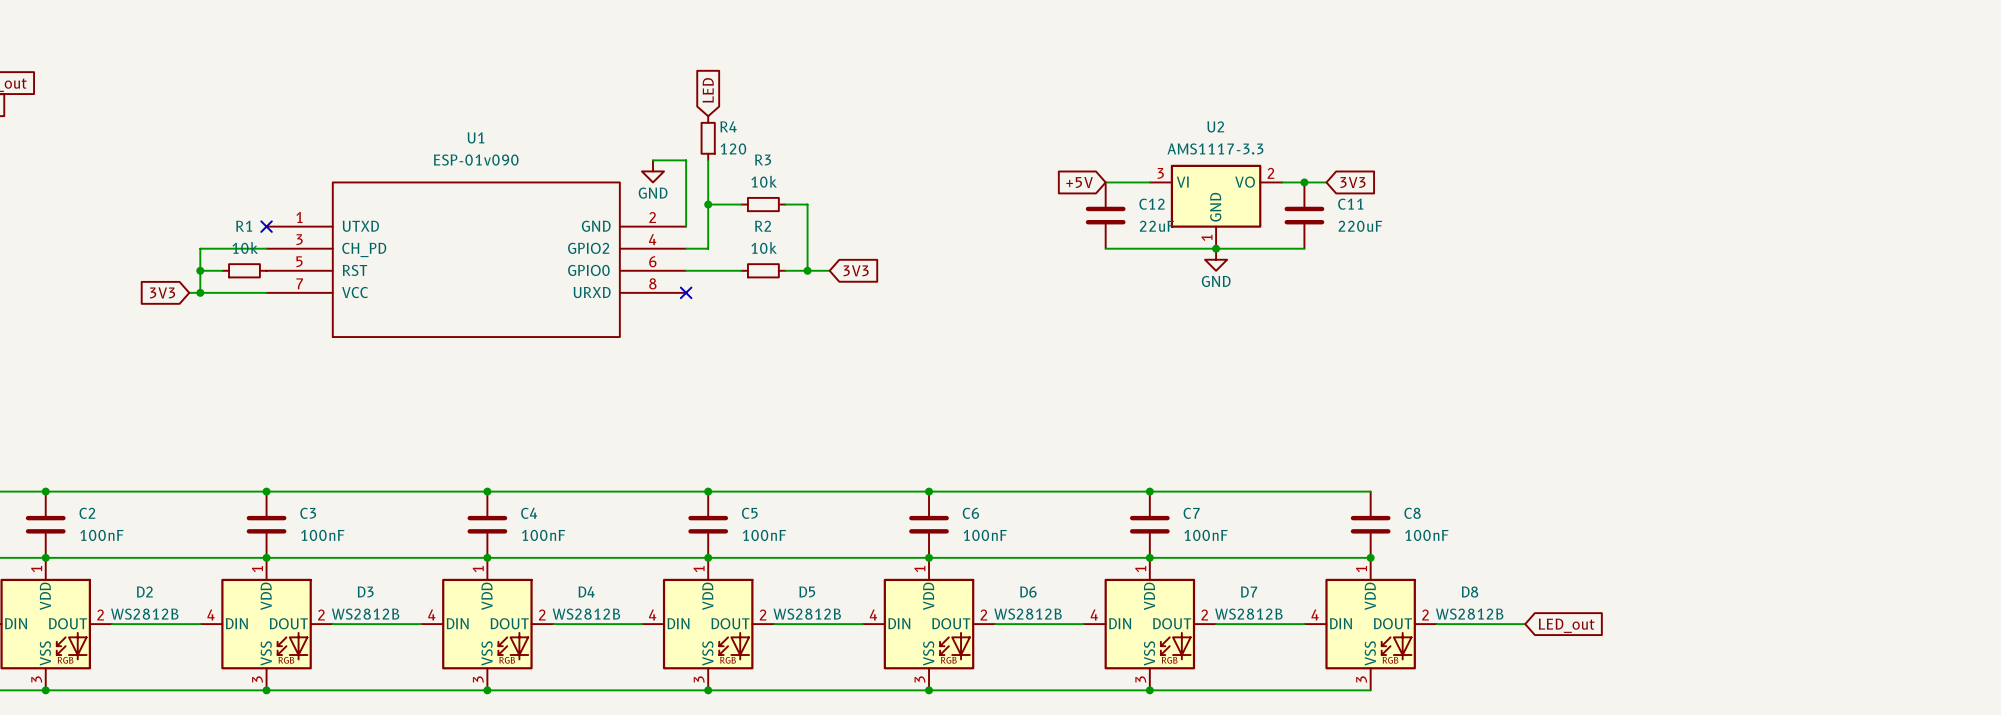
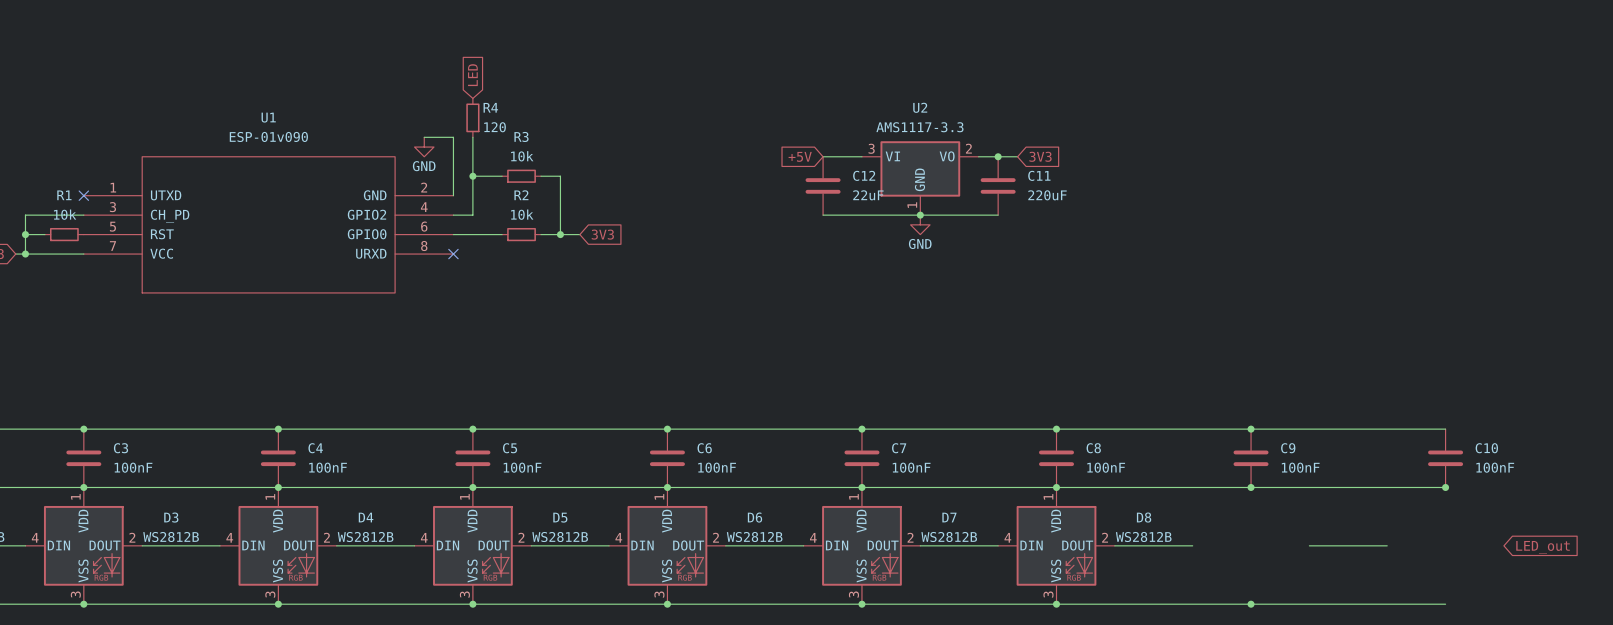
wire: none -> (1056, 429) (1445, 429)
junction: none -> (1056, 429)
junction: none -> (1251, 429)
C9: none -> 100nF (1251, 458)
C10: none -> 100nF (1445, 458)
wire: none -> (1056, 487) (1445, 487)
junction: none -> (1251, 487)
junction: none -> (1445, 487)
wire: none -> (1309, 545) (1387, 545)
global label: LED_out (1566, 625) -> none
global label: none -> LED_out (1543, 547)
wire: none -> (1056, 604) (1445, 604)
junction: none -> (1056, 604)
junction: none -> (1251, 604)

